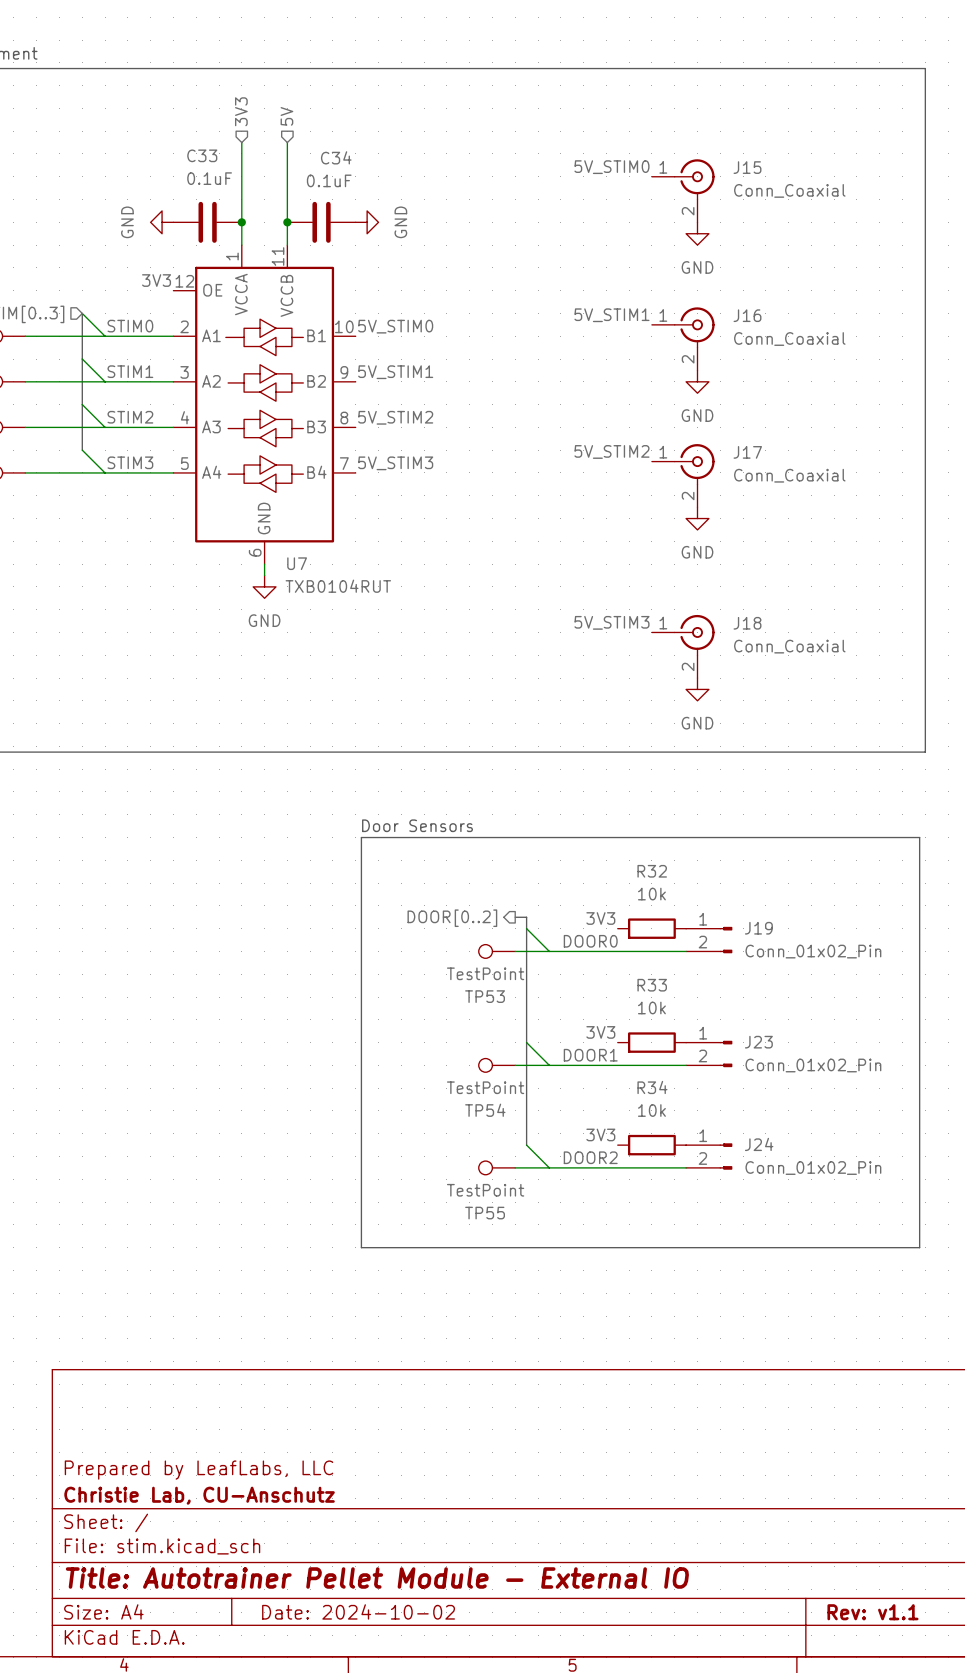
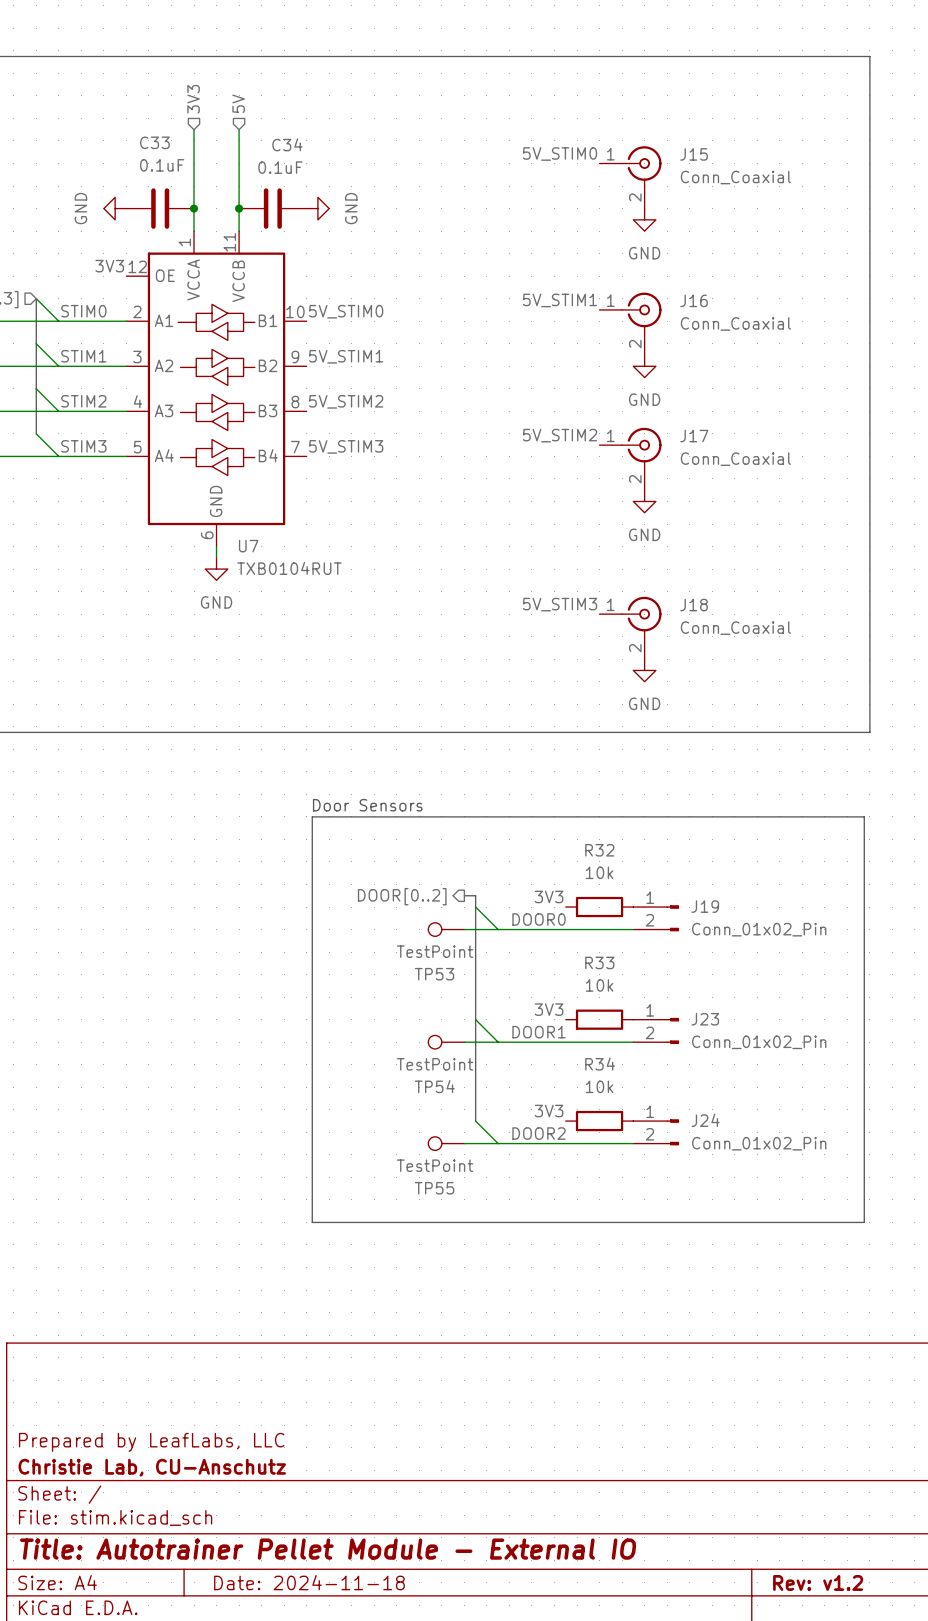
title block: Date: 2024-10-02 (358, 1611) -> Date: 2024-11-18 (309, 1582)
title block: Rev: v1.1 (872, 1612) -> Rev: v1.2 (818, 1582)

